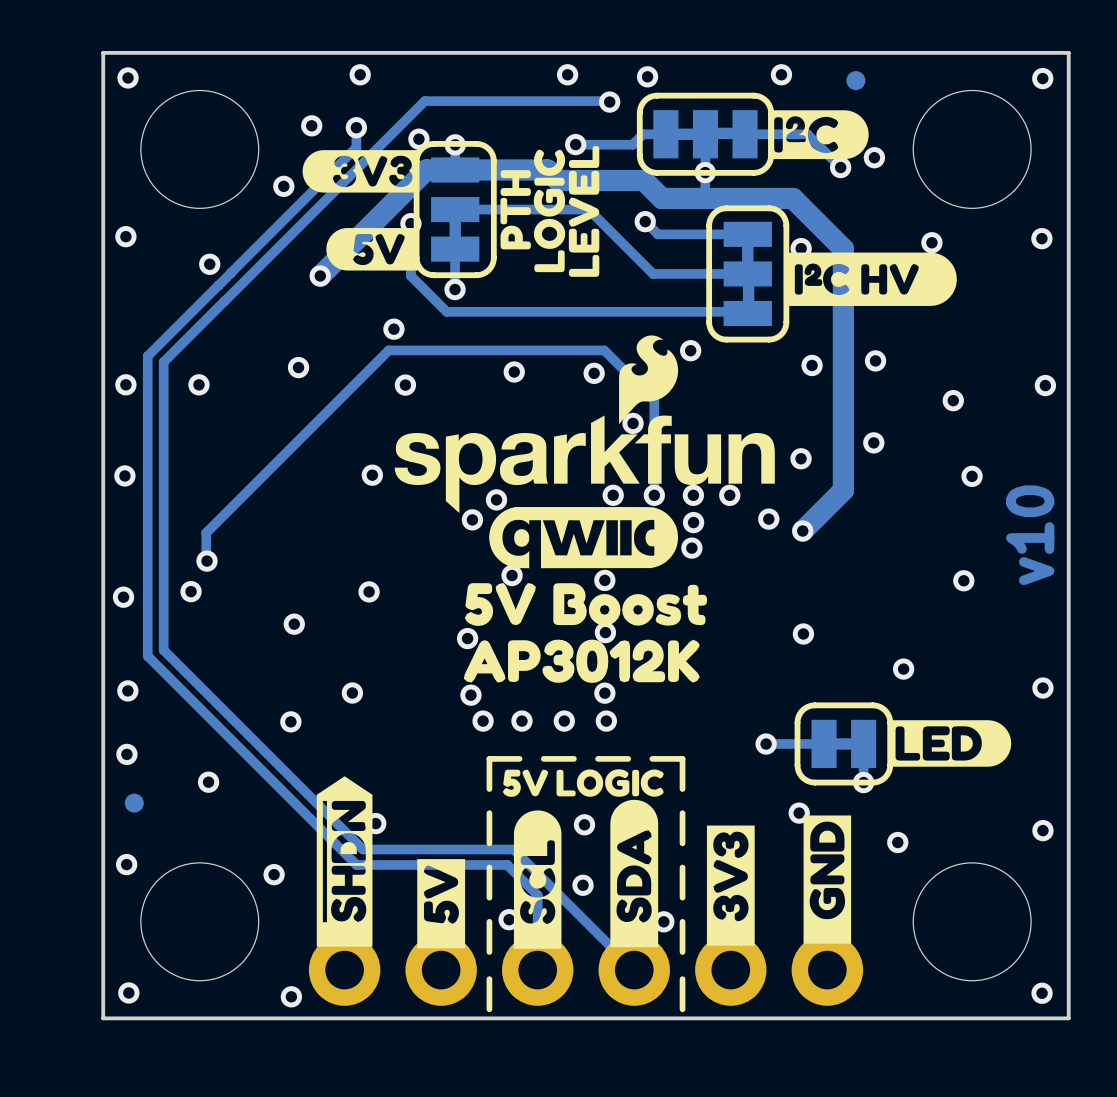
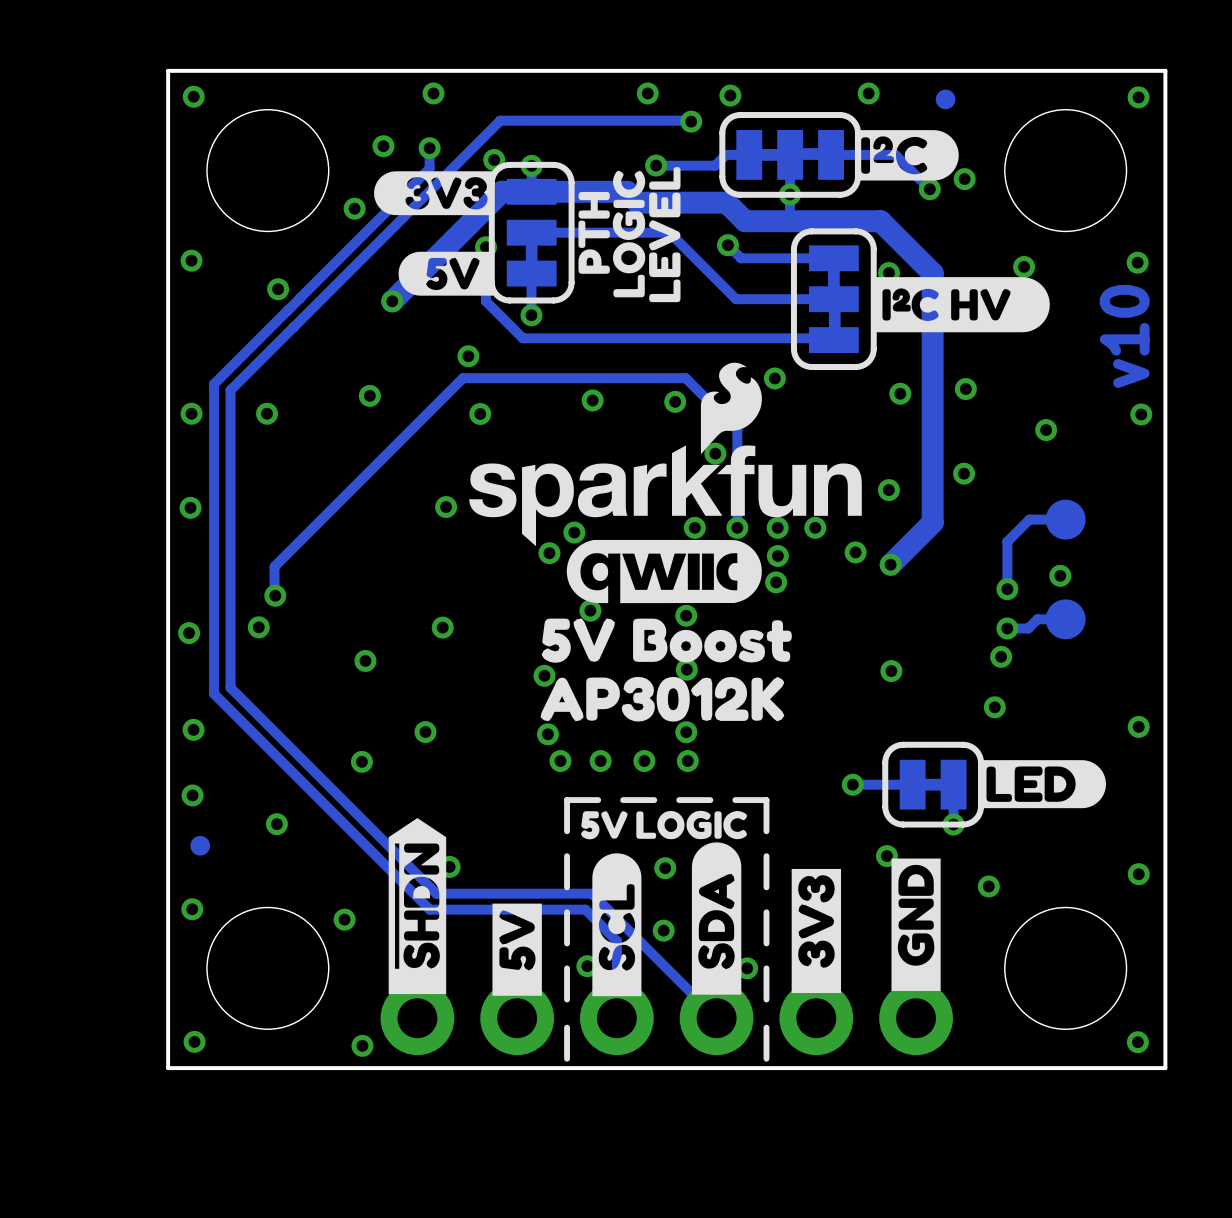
via: (972, 476) -> none
track: none -> (1065, 519) (1029, 519) (1007, 541) (1007, 589)
part: none -> (1065, 519)
text position: v10 (1030, 535) -> v10 (1124, 336)
via: none -> (1060, 575)
via: none -> (1007, 589)
via: (963, 580) -> none
track: none -> (1065, 619) (1037, 619) (1028, 628) (1007, 628)
part: none -> (1065, 619)
via: none -> (1007, 628)
via: none -> (1001, 656)

